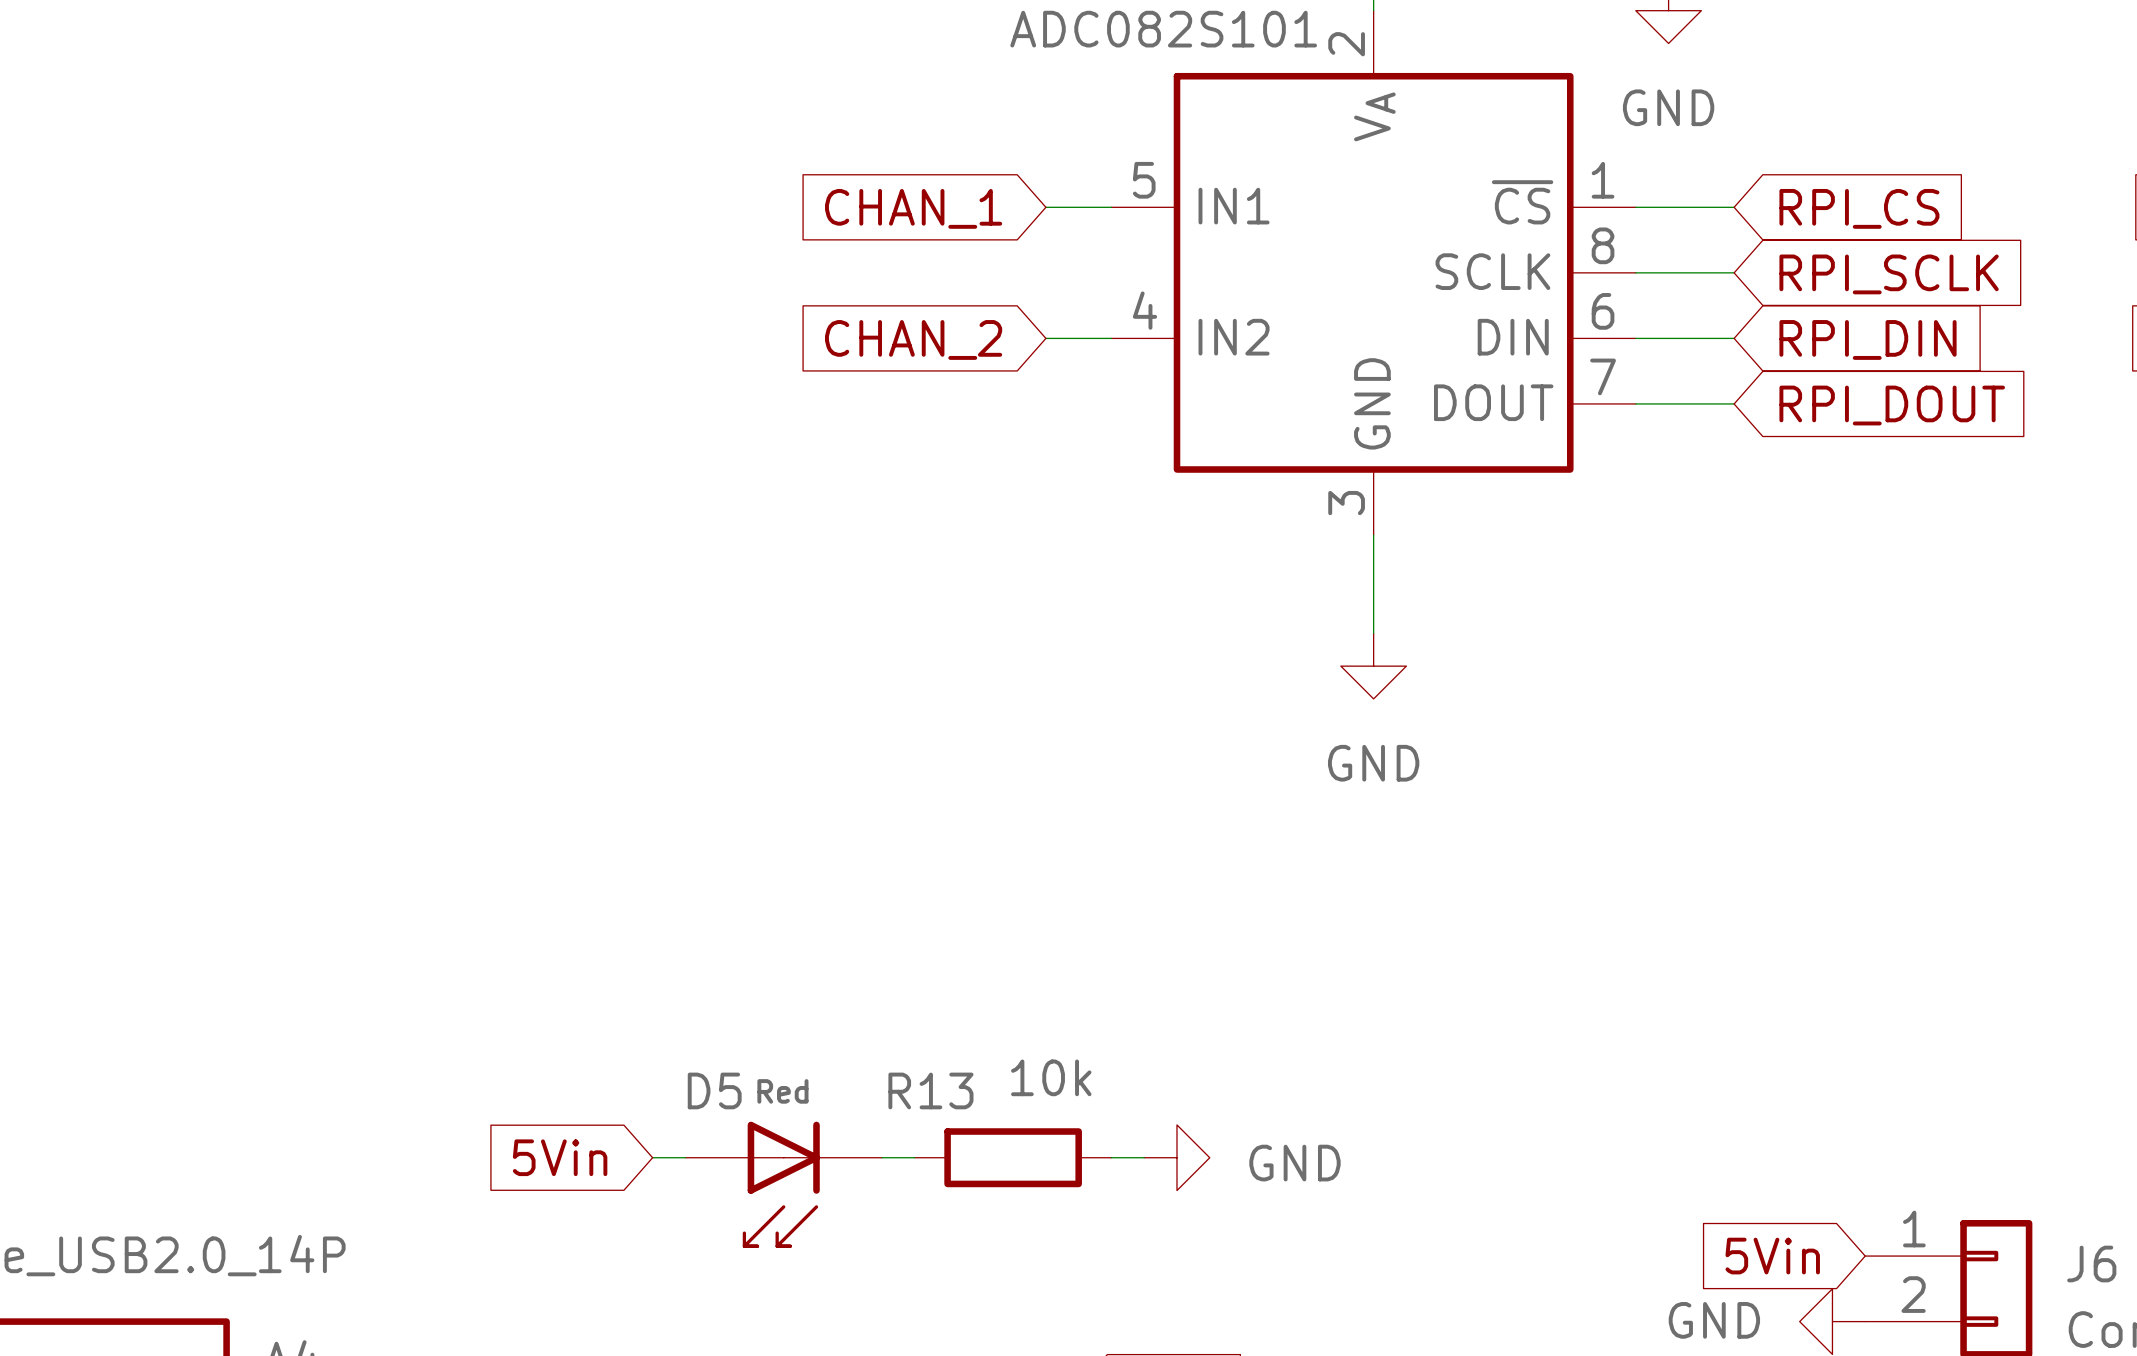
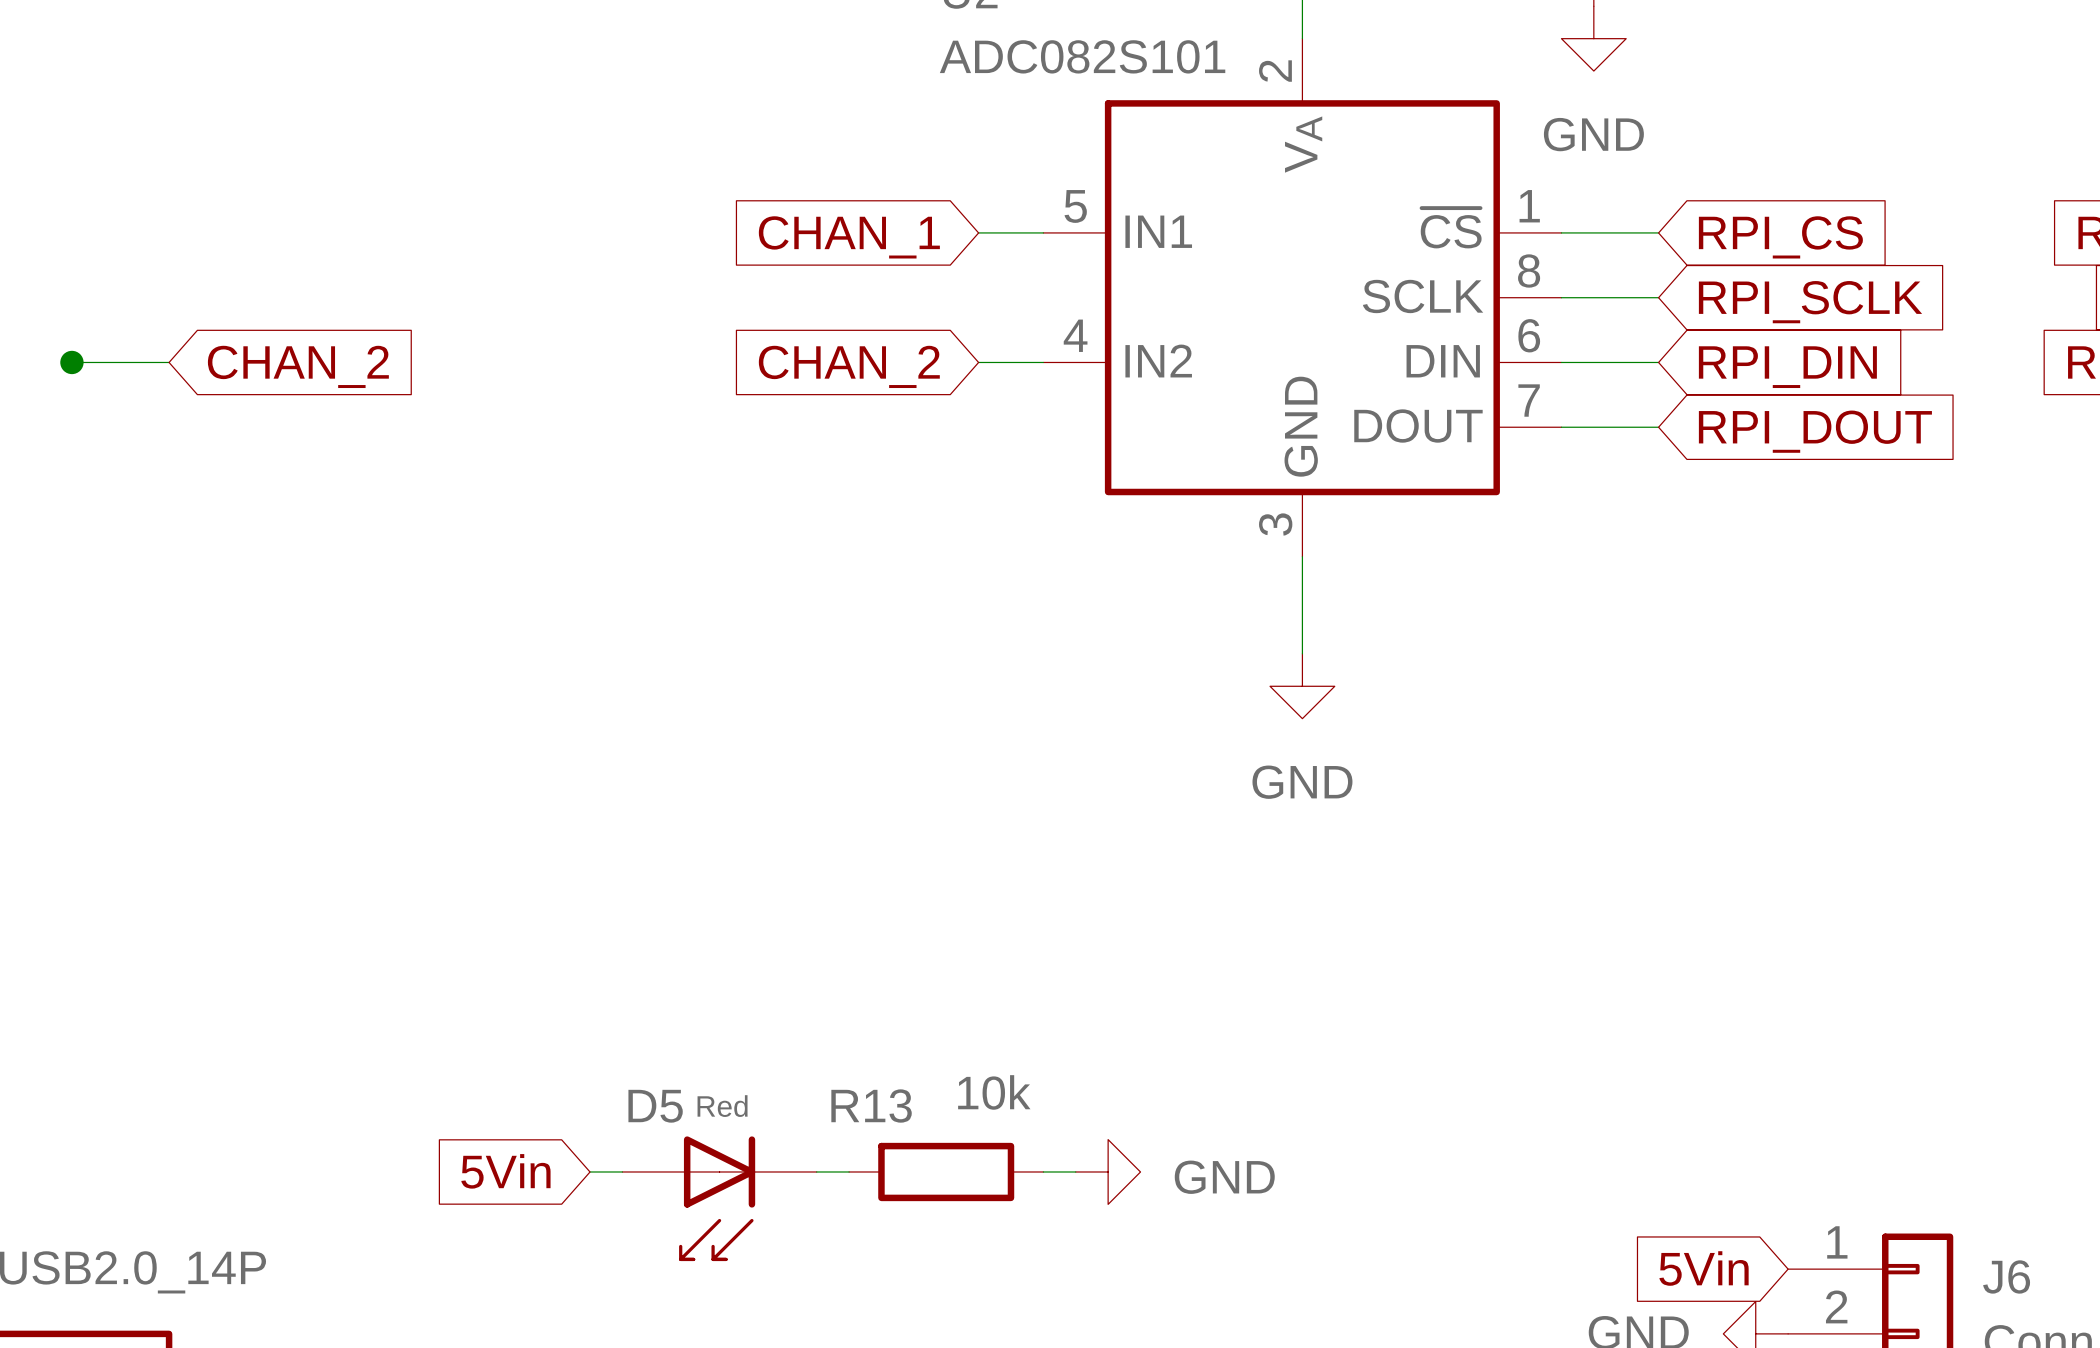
wire: none -> (71, 362) (169, 362)
junction: none -> (71, 362)
global label: none -> CHAN_2 (298, 366)

